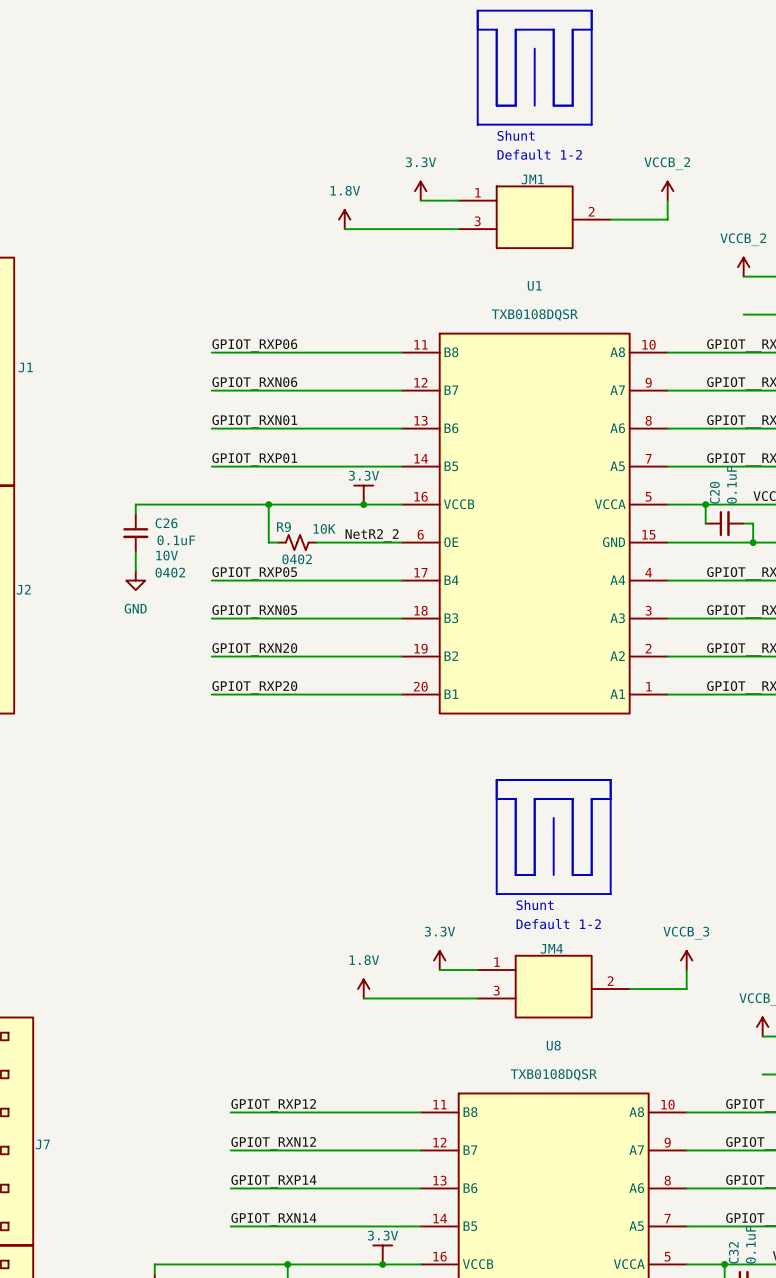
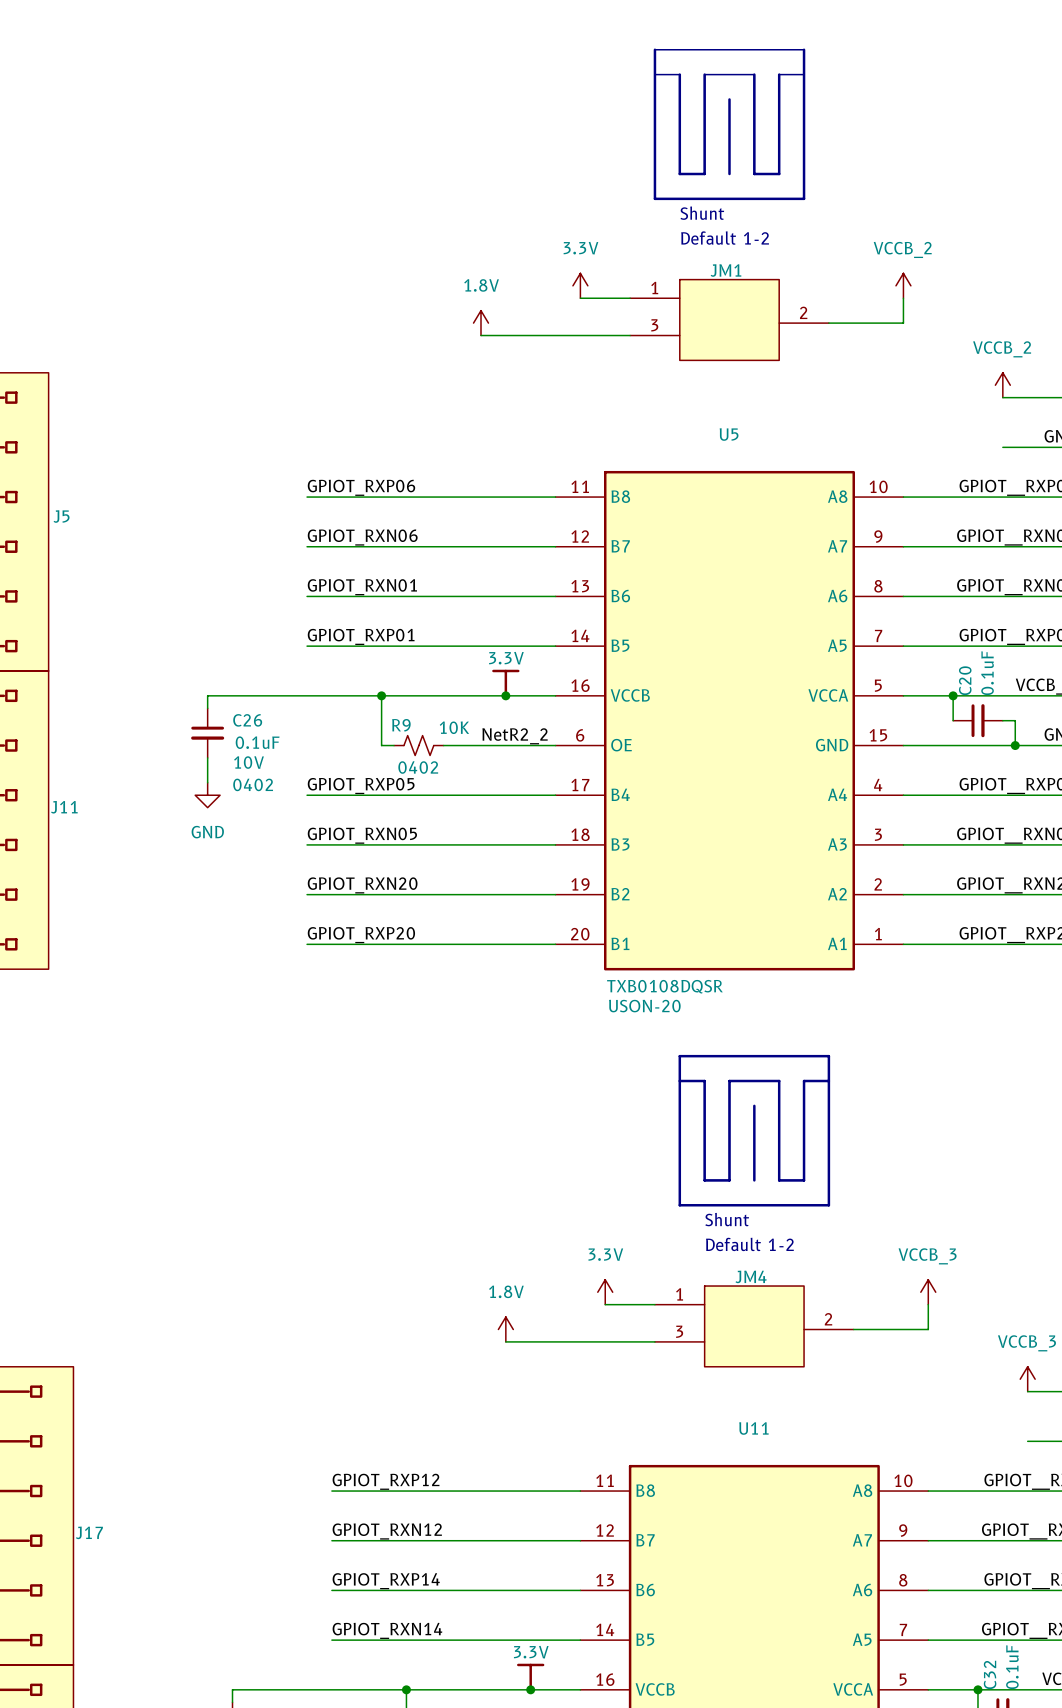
U1 name: U1 (534, 285) -> U5 (729, 434)
U1 text: TXB0108DQSR (534, 315) -> none
J1 name: J1 (25, 367) -> J5 (61, 516)
J2 name: J2 (23, 589) -> J11 (64, 807)
U1 value: none -> TXB0108DQSR (664, 986)
U1 text: none -> USON-20 (644, 1006)
U8 name: U8 (553, 1045) -> U11 (753, 1428)
U8 text: TXB0108DQSR (553, 1074) -> none
J7 name: J7 (42, 1144) -> J17 (89, 1532)

